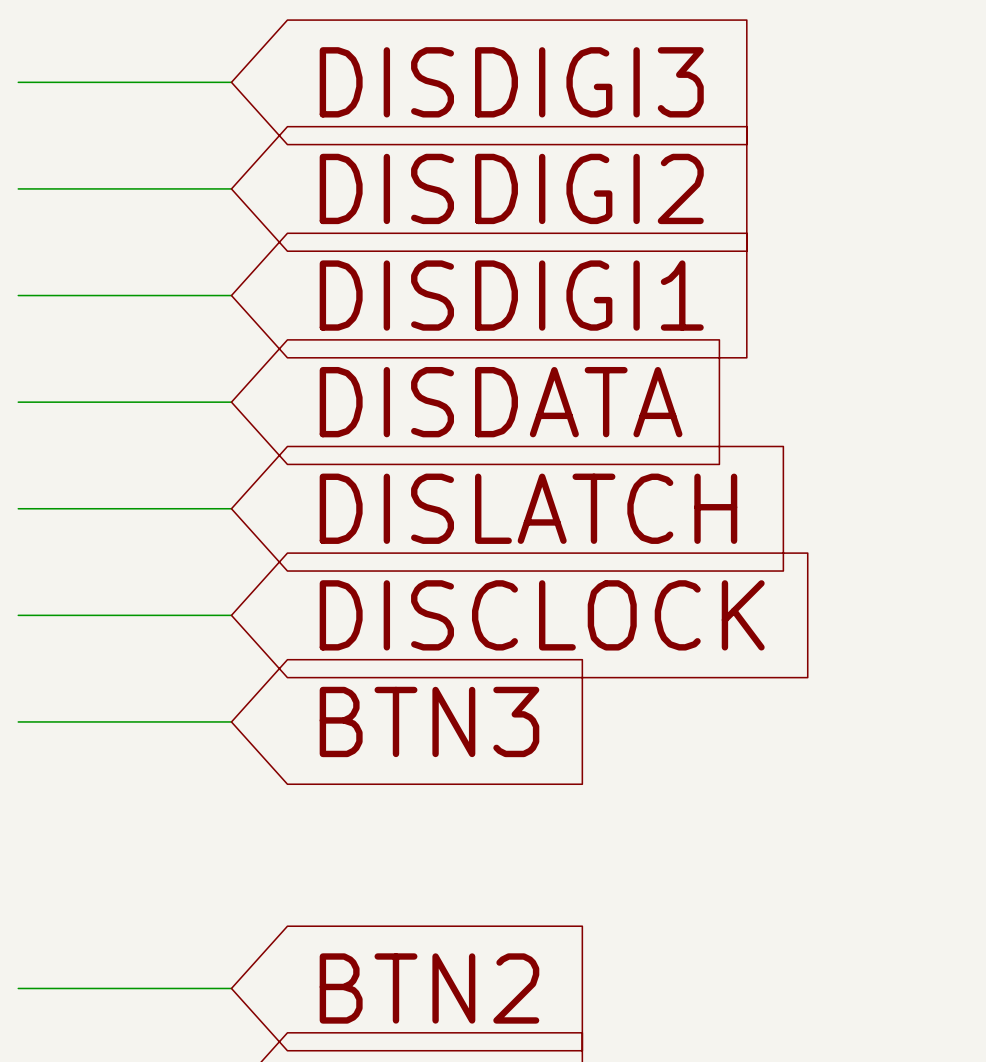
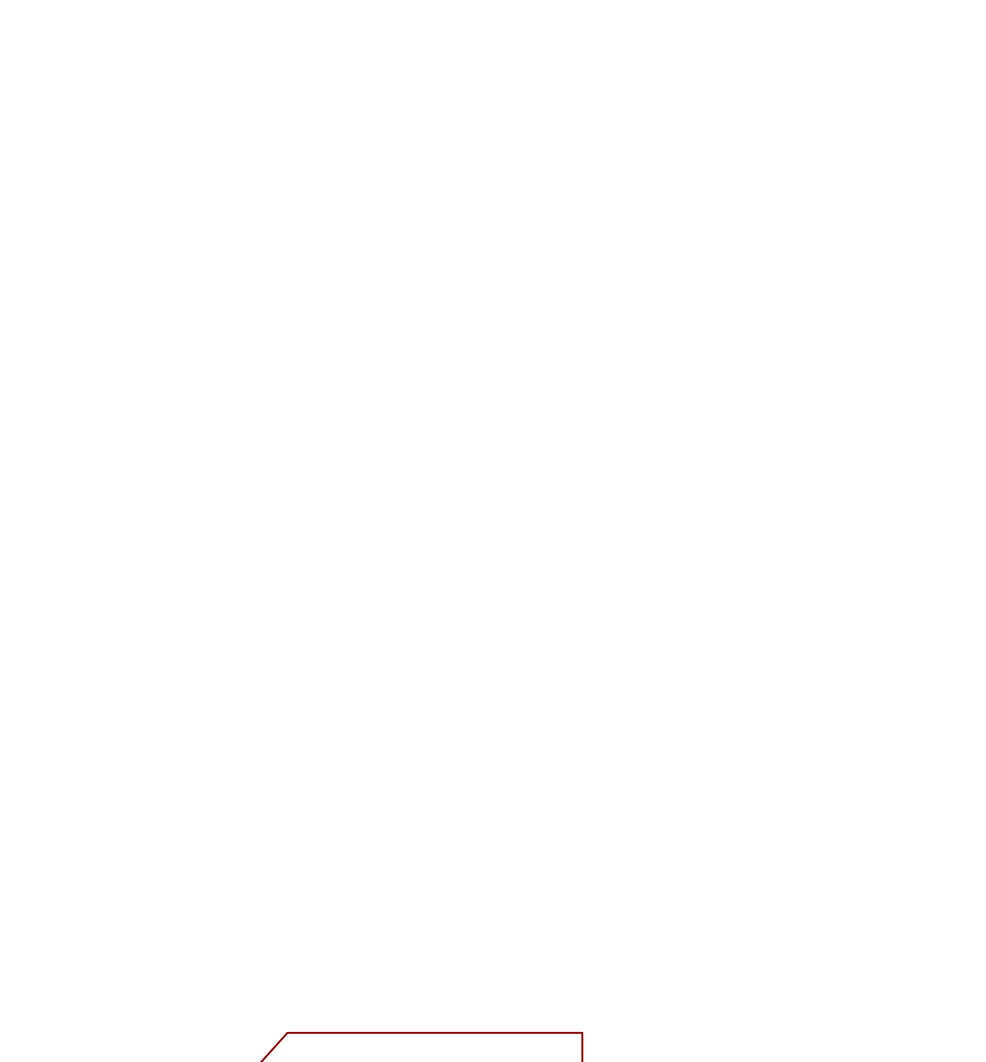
wire: (18, 82) (231, 82) -> none
global label: DISDIGI3 (511, 82) -> none
wire: (18, 188) (231, 188) -> none
global label: DISDIGI2 (511, 188) -> none
wire: (18, 295) (231, 295) -> none
global label: DISDIGI1 (511, 295) -> none
wire: (18, 402) (231, 402) -> none
global label: DISDATA (501, 402) -> none
wire: (18, 508) (231, 508) -> none
global label: DISLATCH (528, 508) -> none
wire: (18, 615) (231, 615) -> none
global label: DISCLOCK (542, 615) -> none
wire: (18, 721) (231, 721) -> none
global label: BTN3 (429, 721) -> none
wire: (18, 988) (231, 988) -> none
global label: BTN2 (429, 988) -> none

